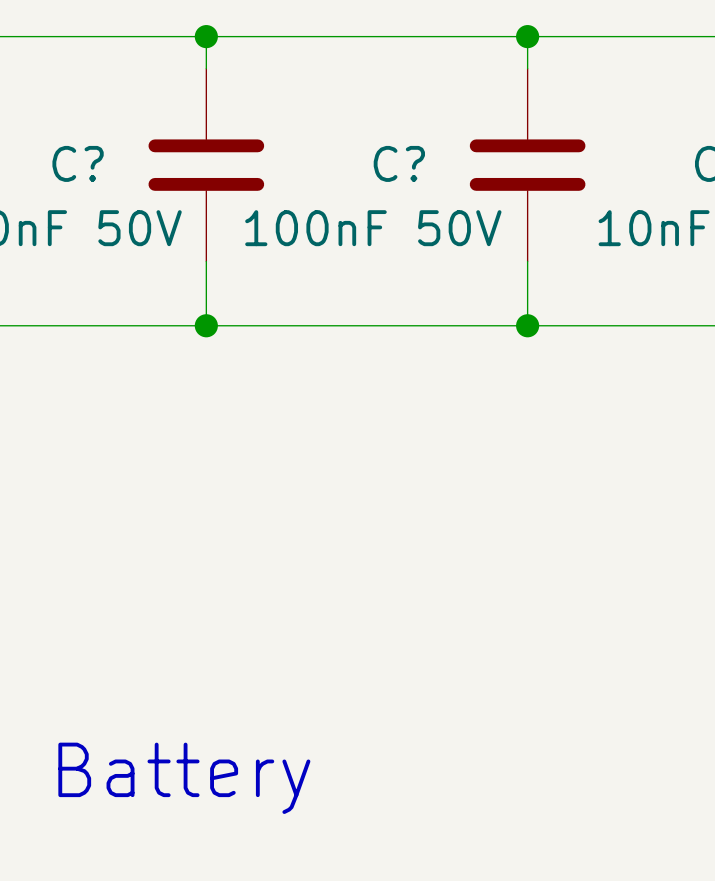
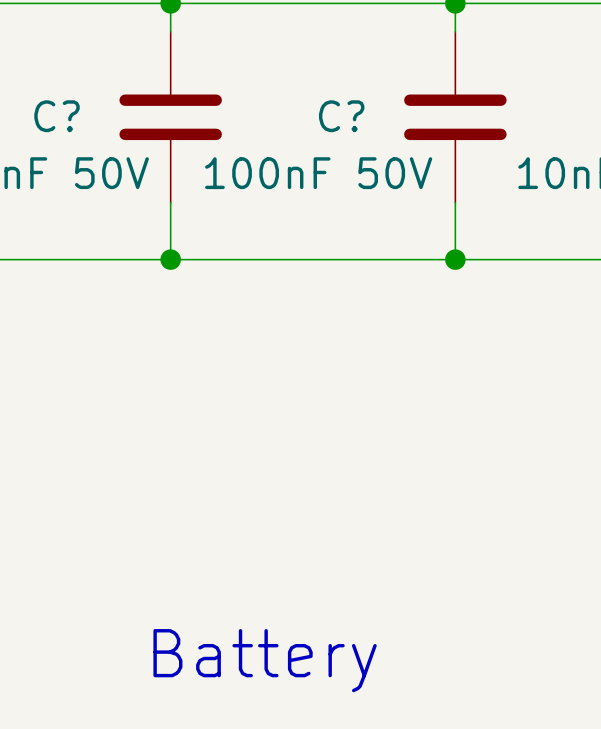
text position: Battery (184, 778) -> Battery (265, 660)

